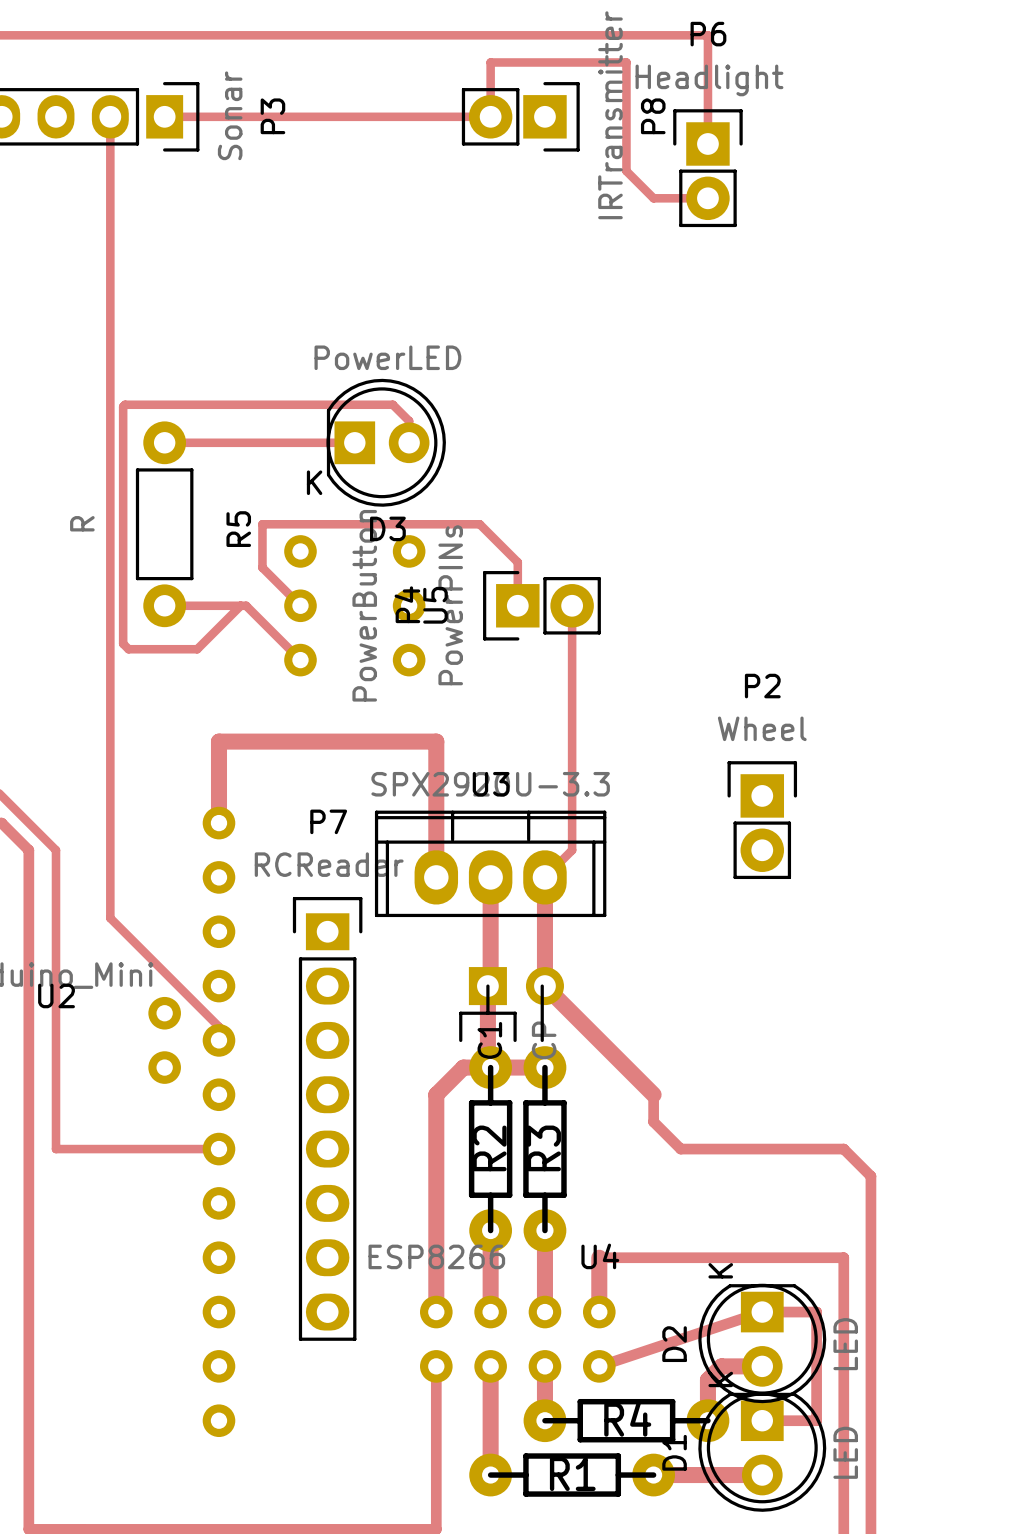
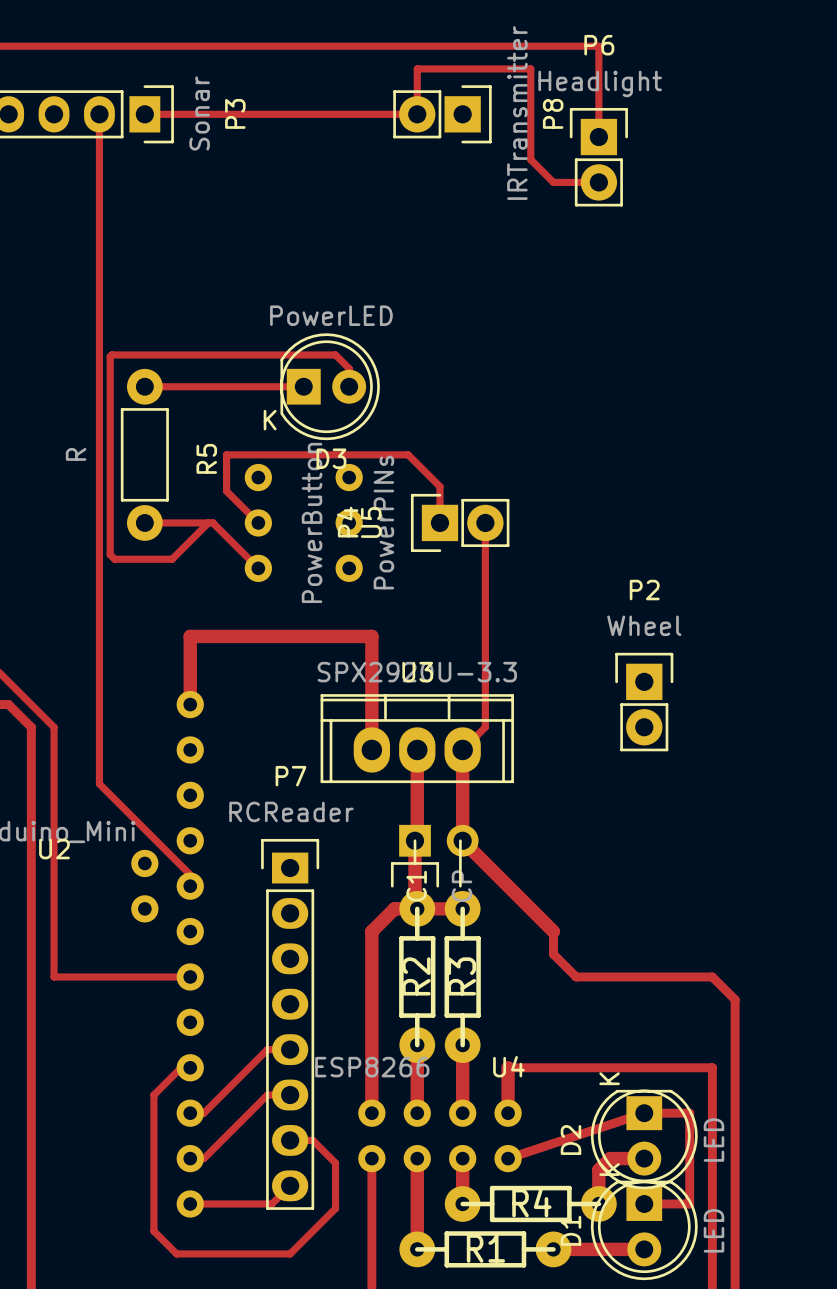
P7 position: (327, 1118) -> (290, 1024)
track: none -> (290, 1049) (267, 1049) (203, 1113) (190, 1113)
track: none -> (190, 1067) (181, 1067) (153, 1095) (153, 1231) (176, 1253) (290, 1253) (335, 1208) (335, 1163) (312, 1140) (290, 1140)
track: none -> (290, 1095) (267, 1095) (203, 1158) (190, 1158)
track: none -> (290, 1185) (271, 1203) (190, 1203)

